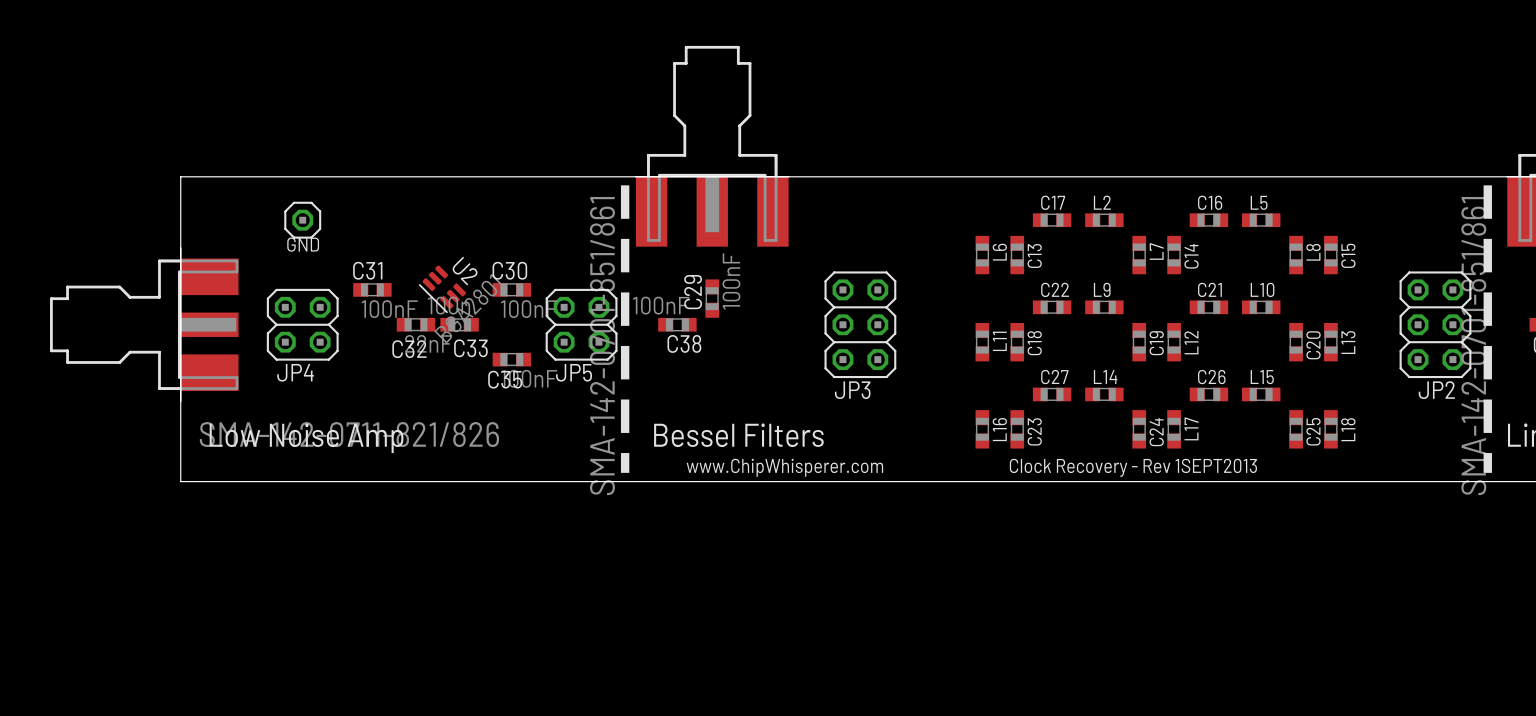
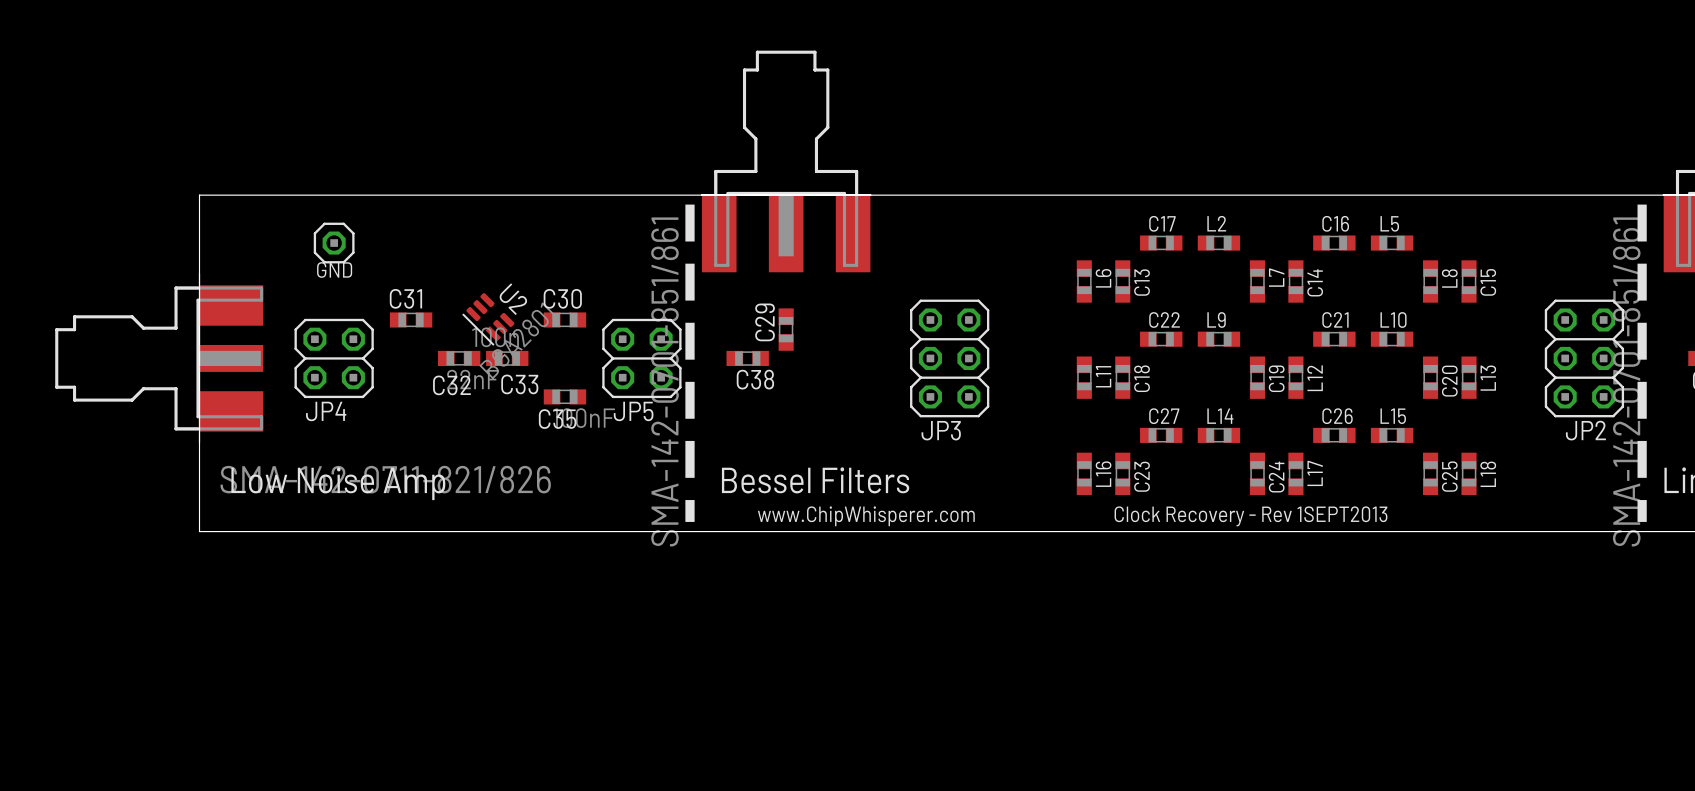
C29 value: 100nF (731, 281) -> none
C38 value: 100nF (661, 305) -> none
C31 value: 100nF (389, 309) -> none
C30 value: 100nF (529, 309) -> none

